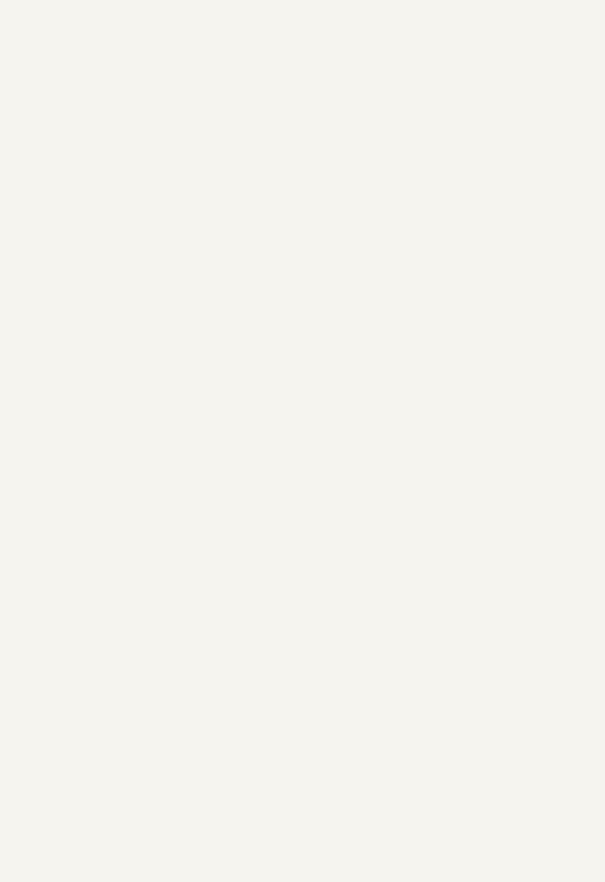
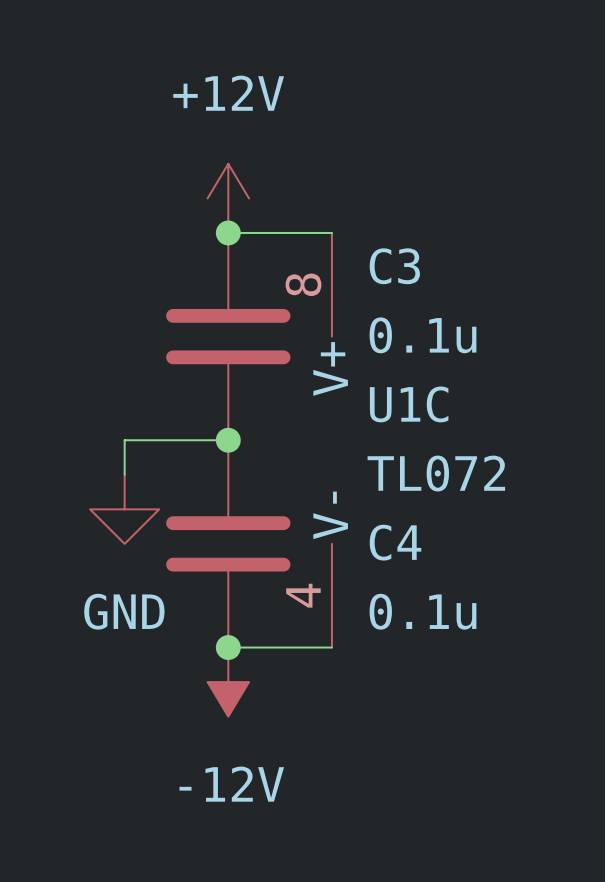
power symbol: none -> +12V (228, 198)
wire: none -> (228, 232) (331, 232)
junction: none -> (228, 232)
C3: none -> 0.1u (228, 336)
wire: none -> (228, 440) (124, 440) (124, 474)
junction: none -> (228, 440)
U1C: none -> TL072 (331, 440)
power symbol: none -> GND (124, 509)
C4: none -> 0.1u (228, 543)
wire: none -> (228, 647) (331, 647)
junction: none -> (228, 647)
power symbol: none -> -12V (228, 682)

